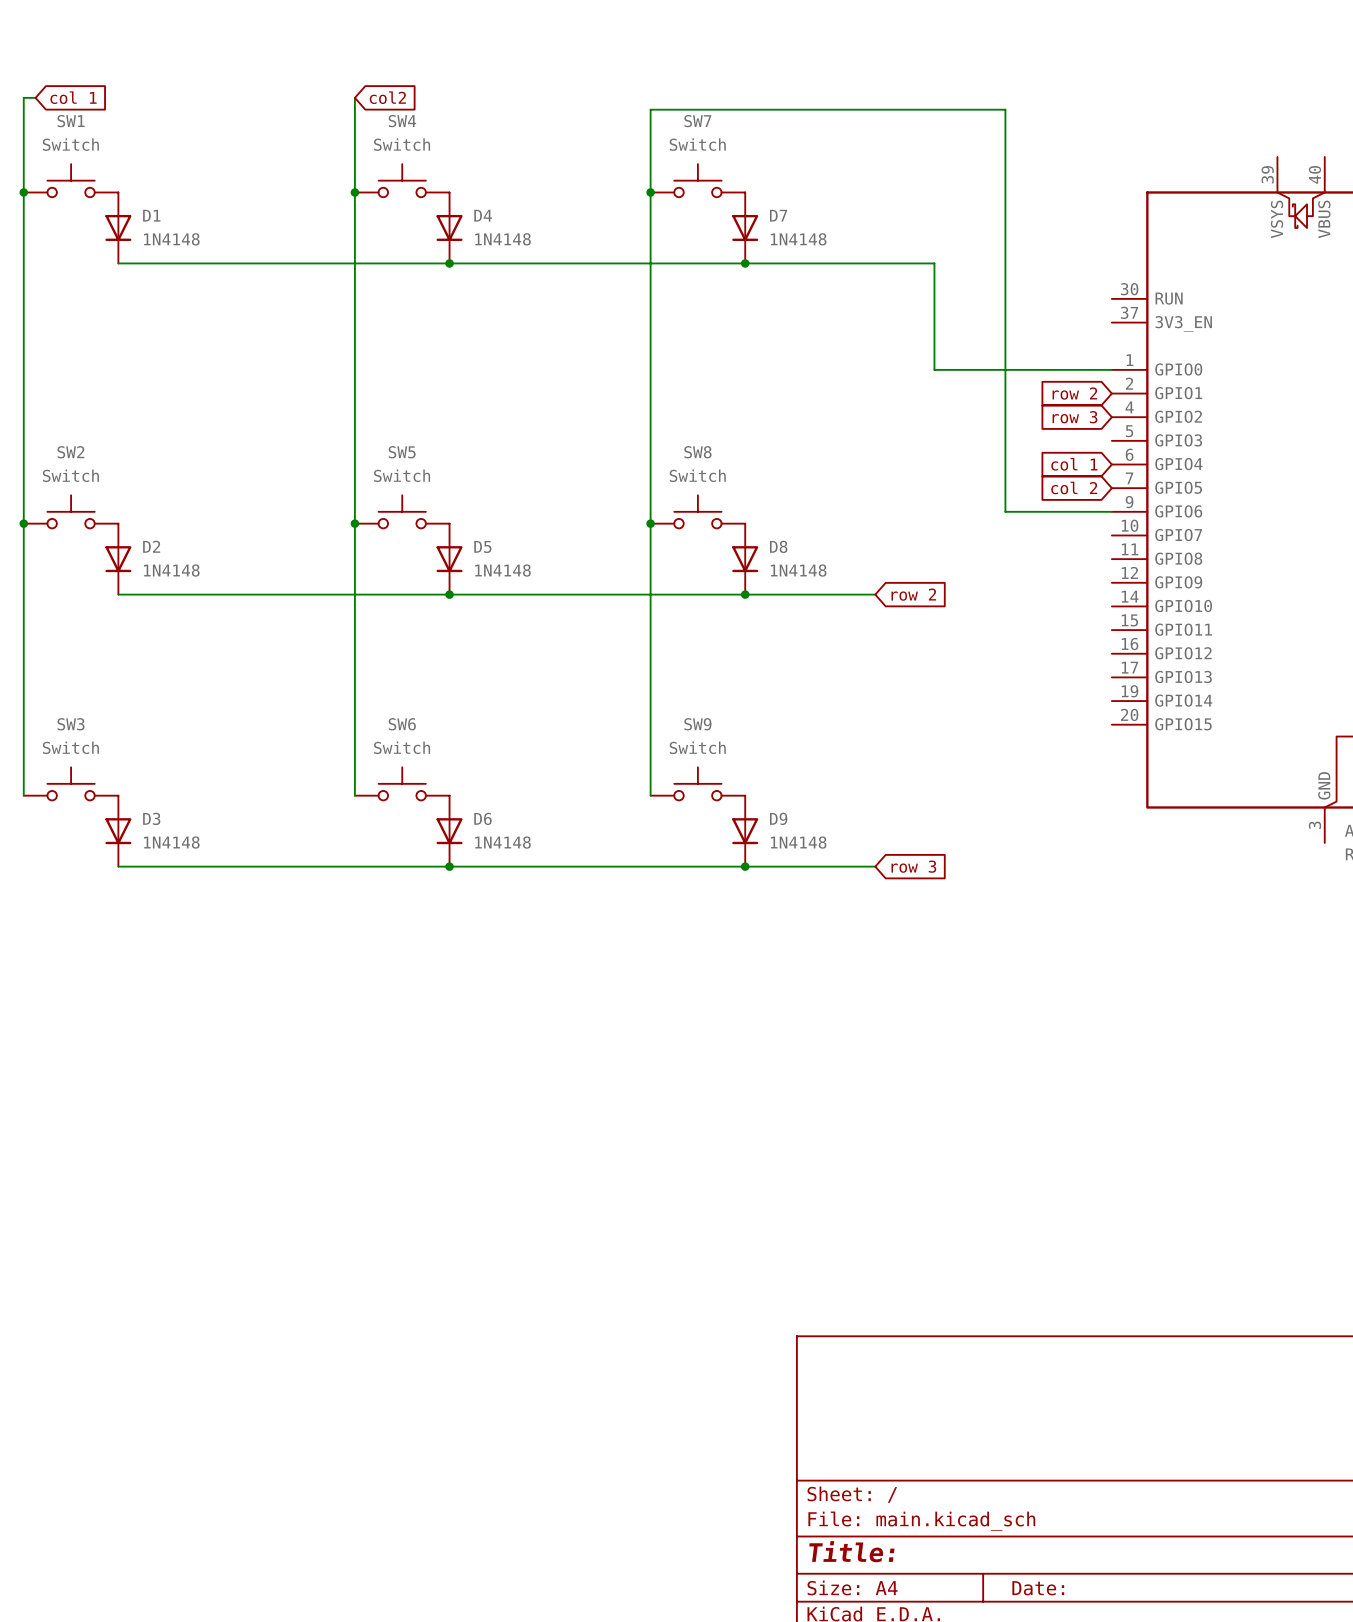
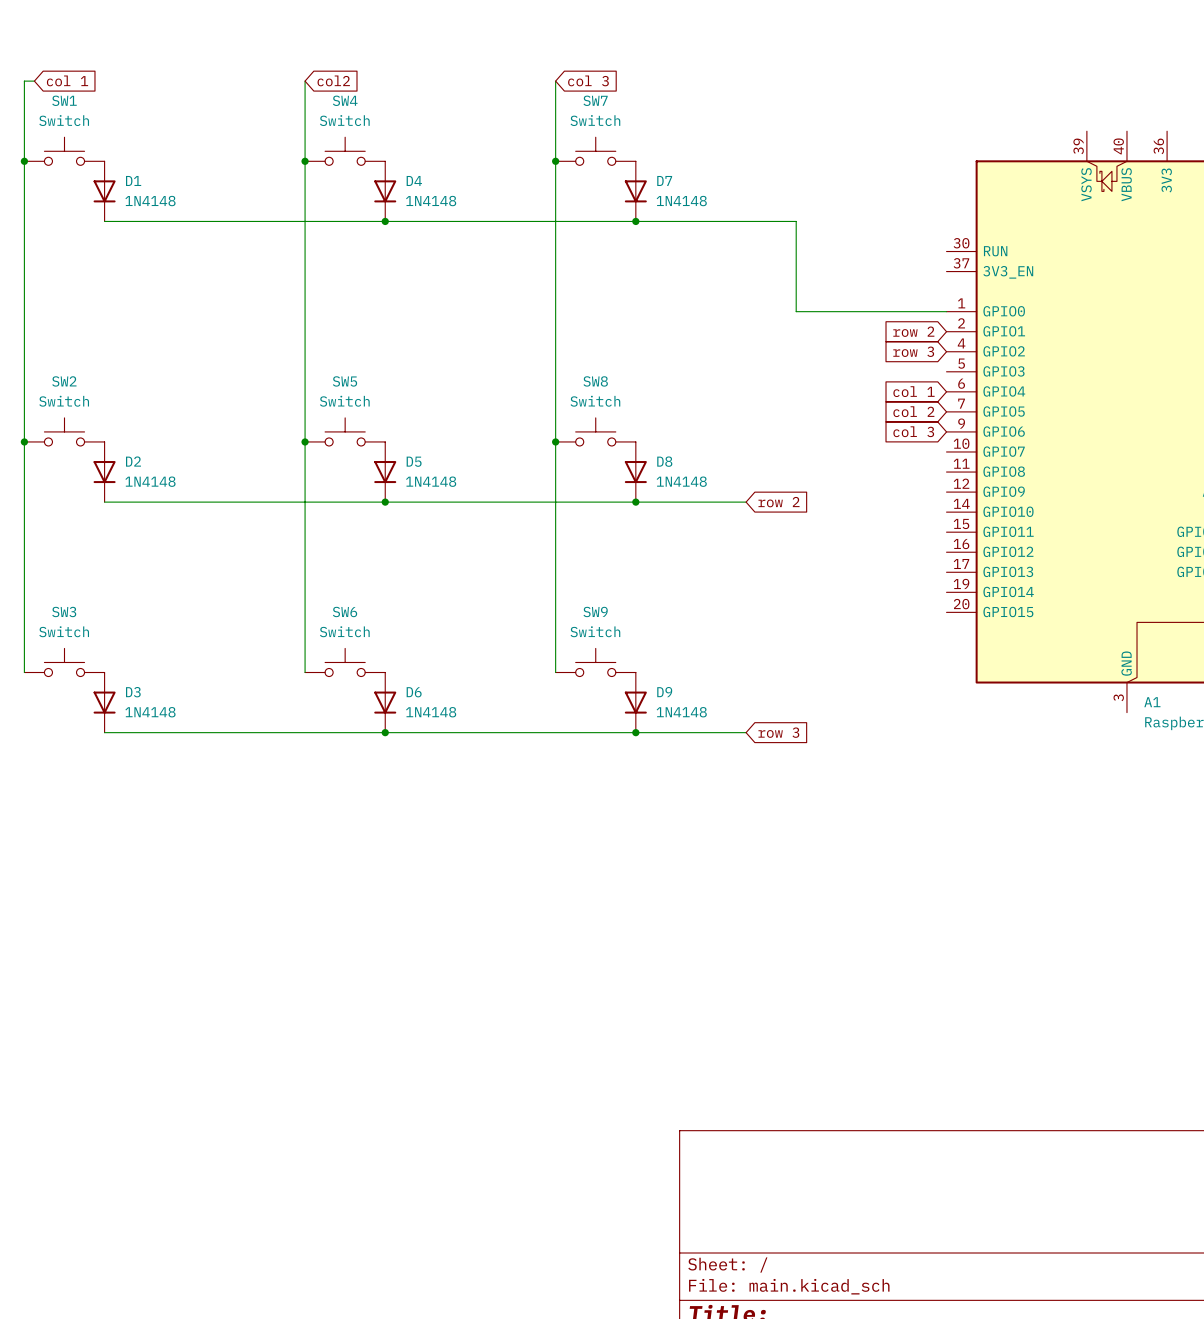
global label: none -> col 3 (588, 80)
wire: (650, 109) (1005, 109) (1005, 511) (1111, 511) -> (555, 91) (555, 81)
global label: none -> col 3 (913, 431)

